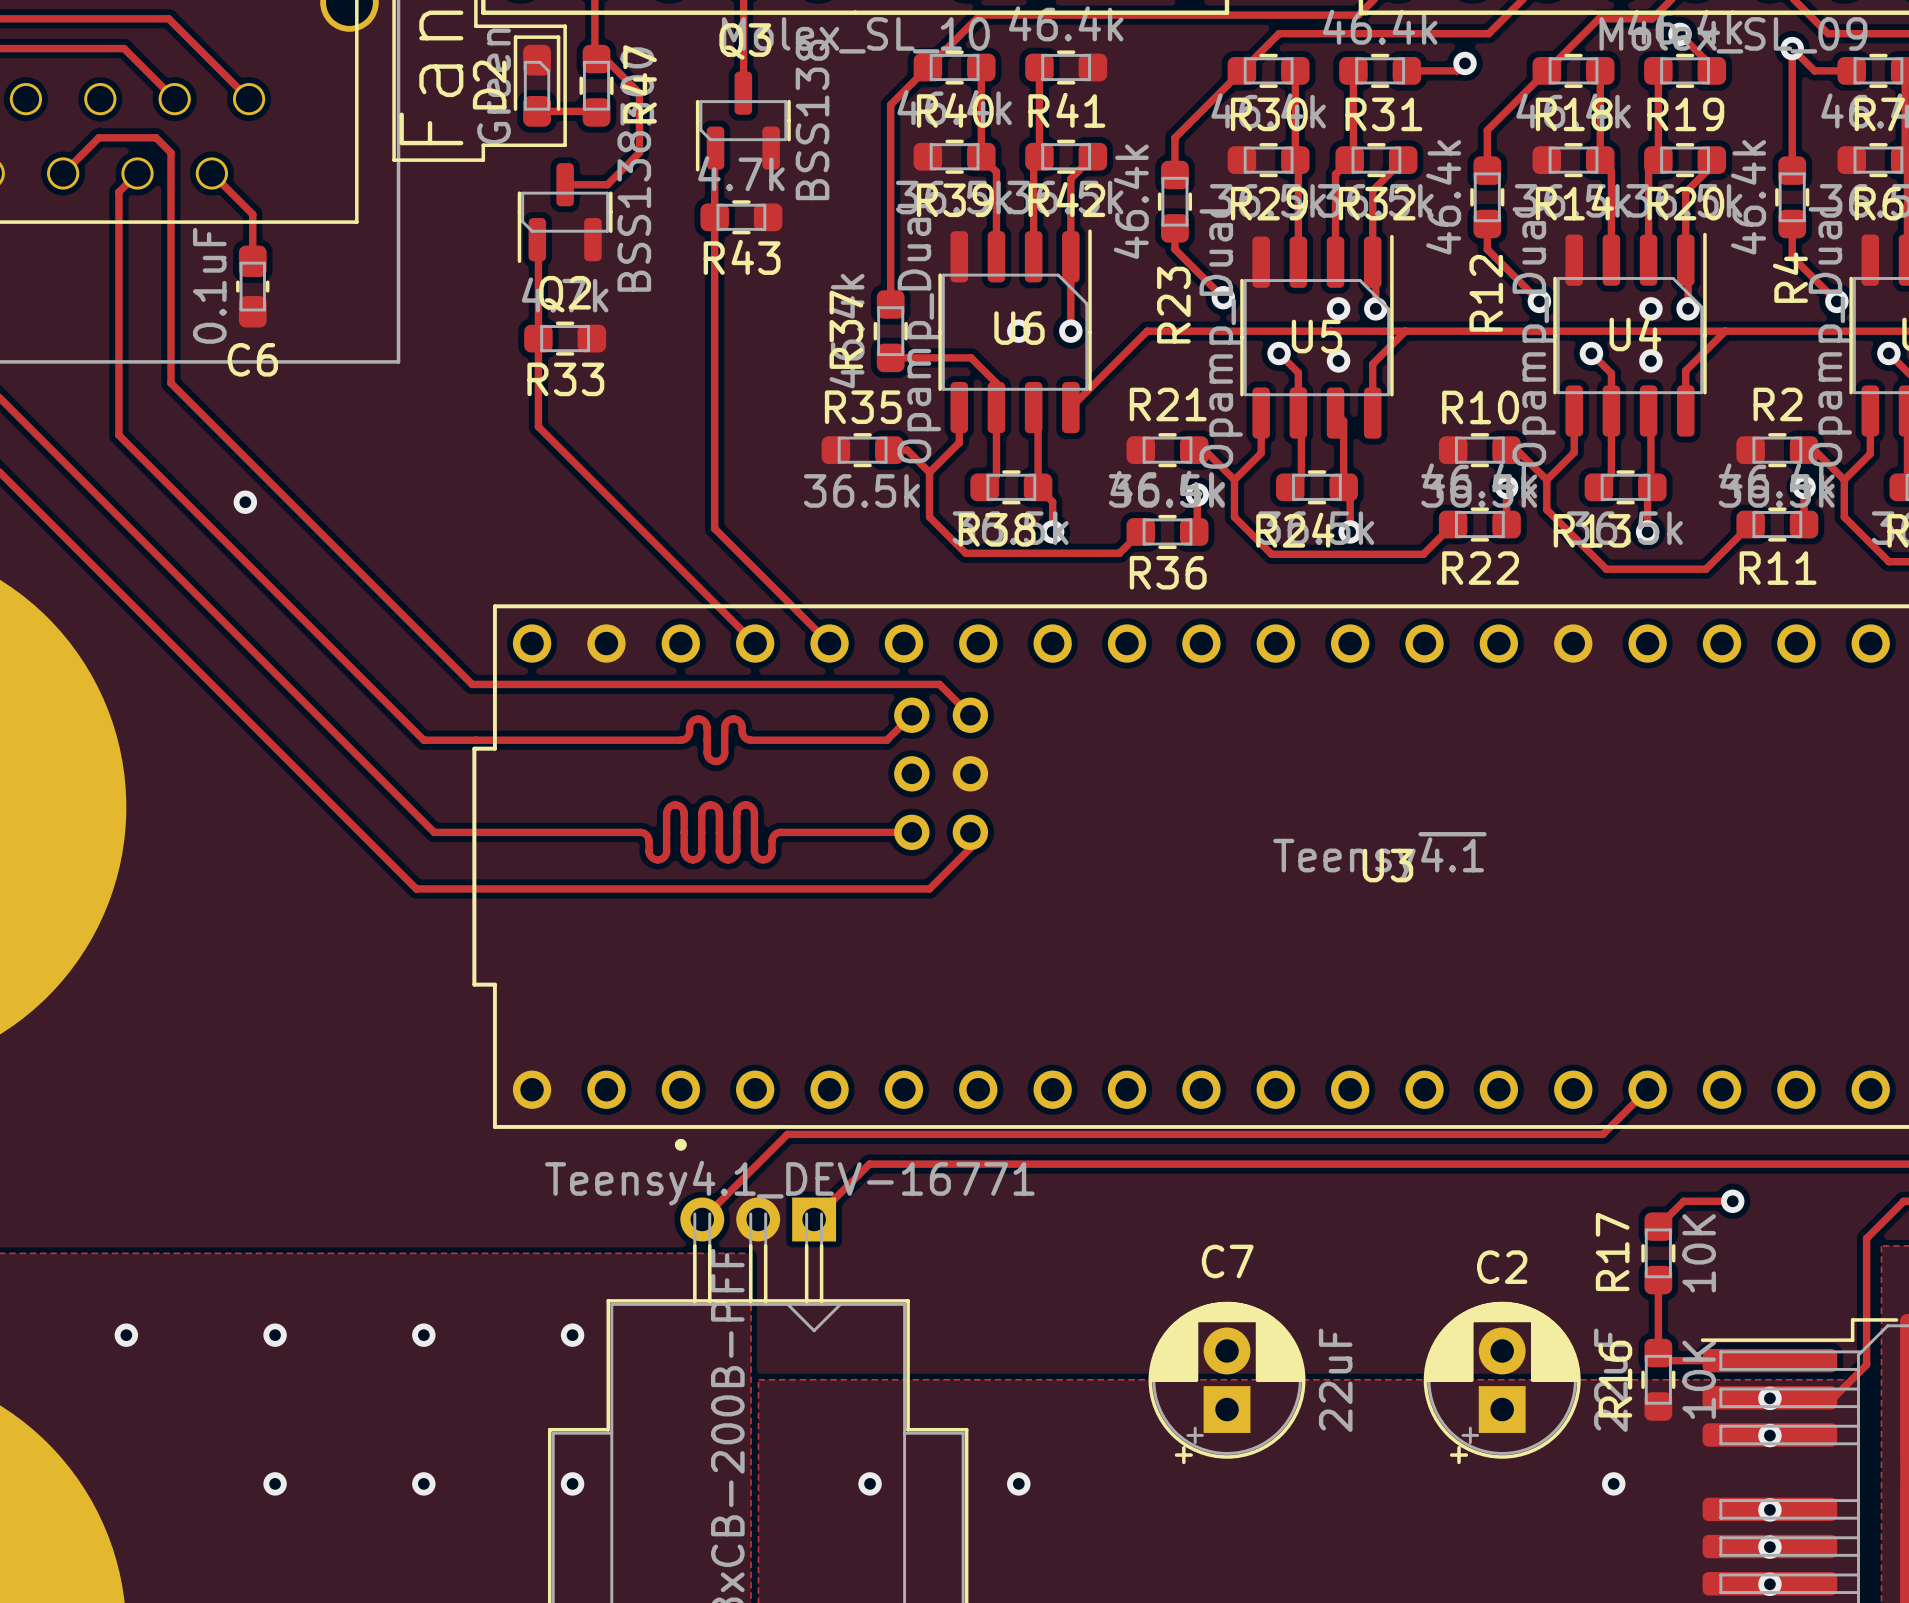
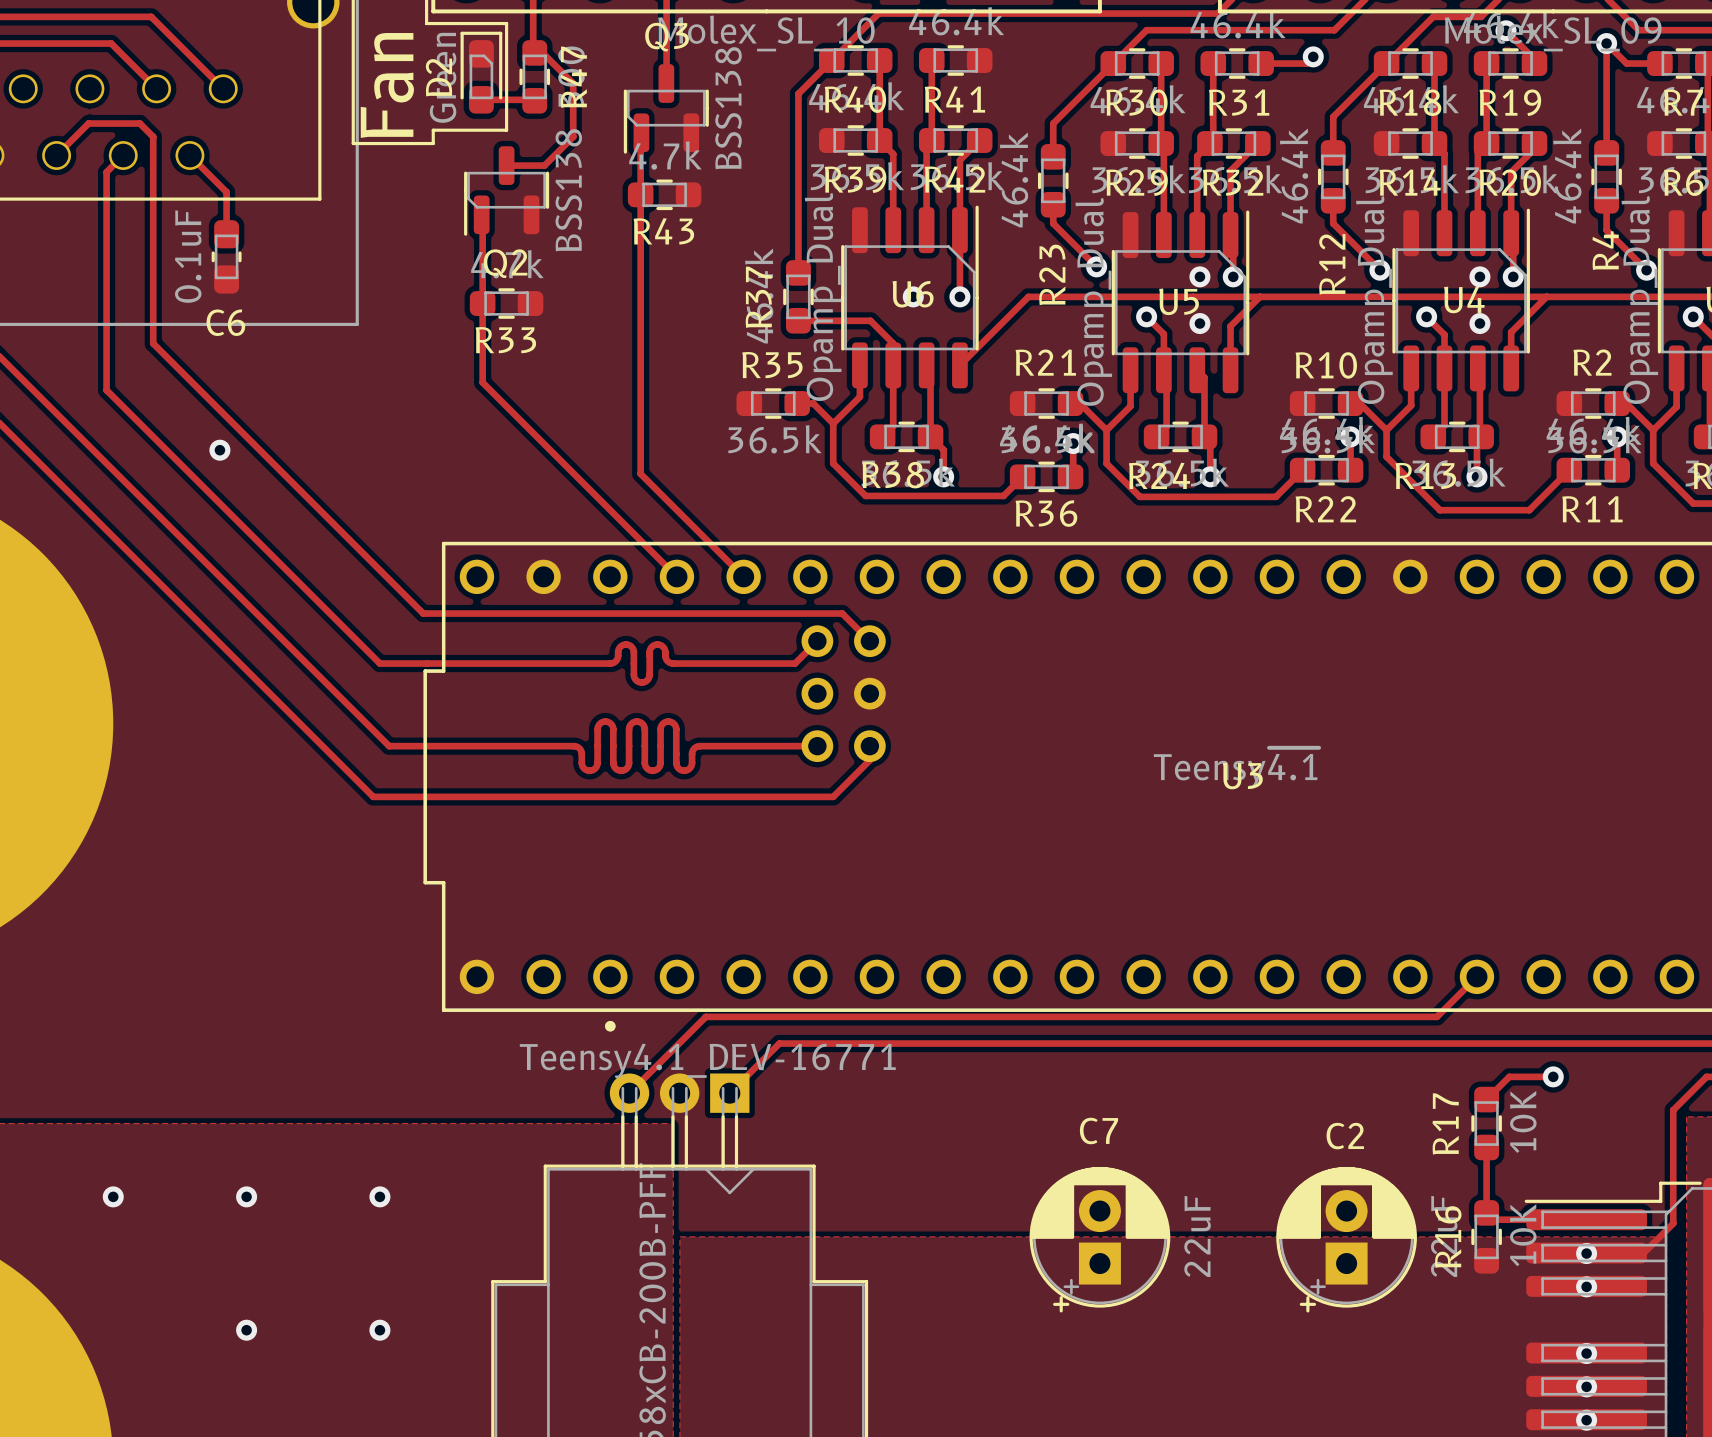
via: (572, 1335) -> none
via: (572, 1483) -> none
via: (870, 1483) -> none
via: (1018, 1483) -> none
via: (1613, 1483) -> none

